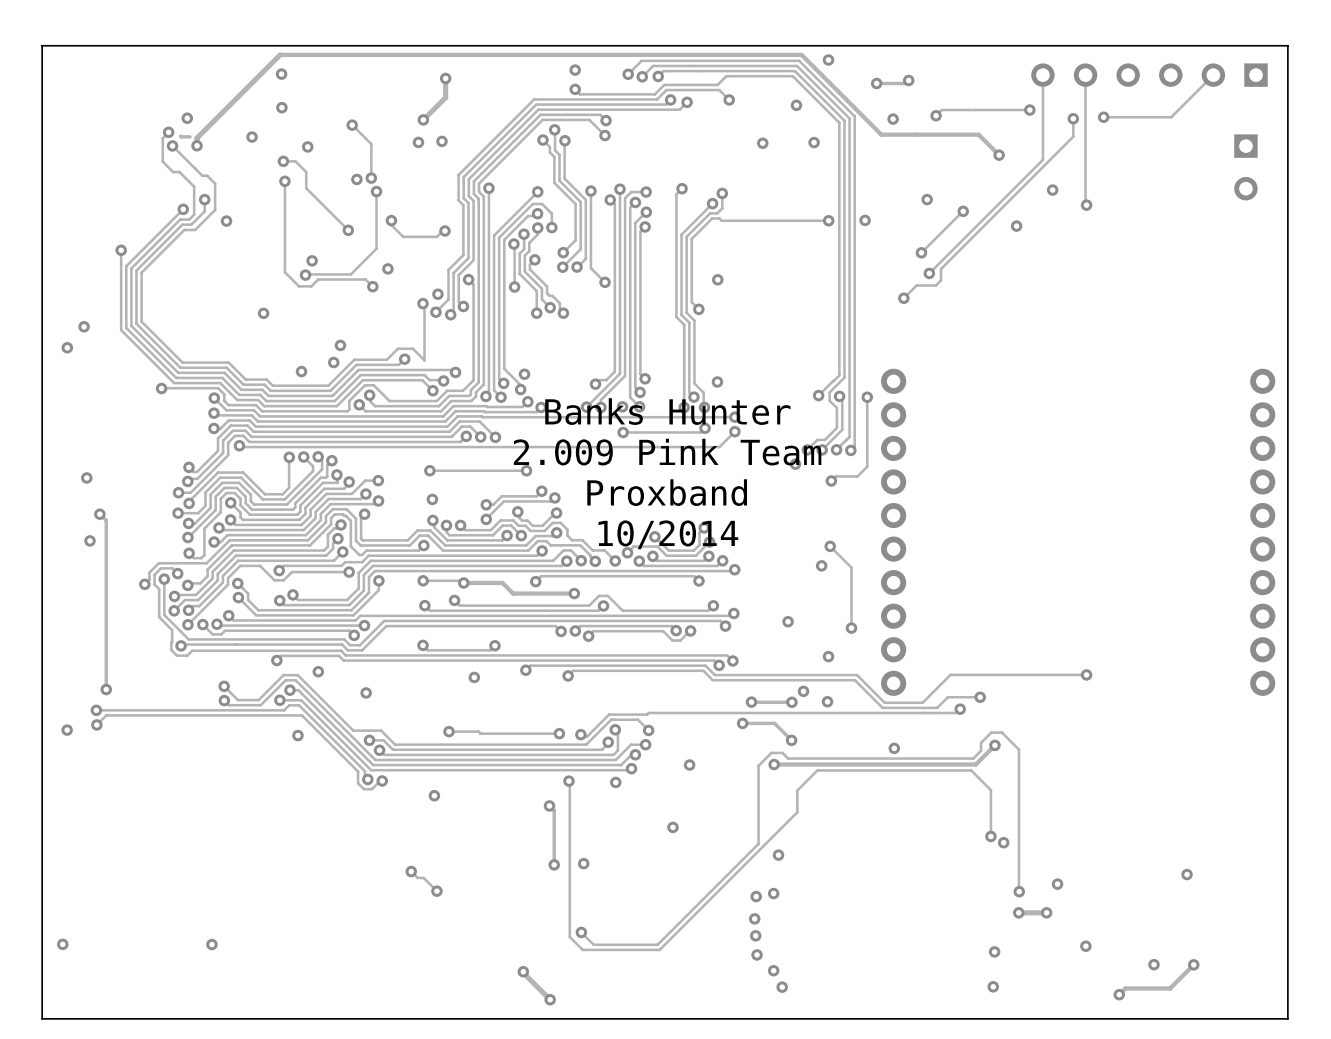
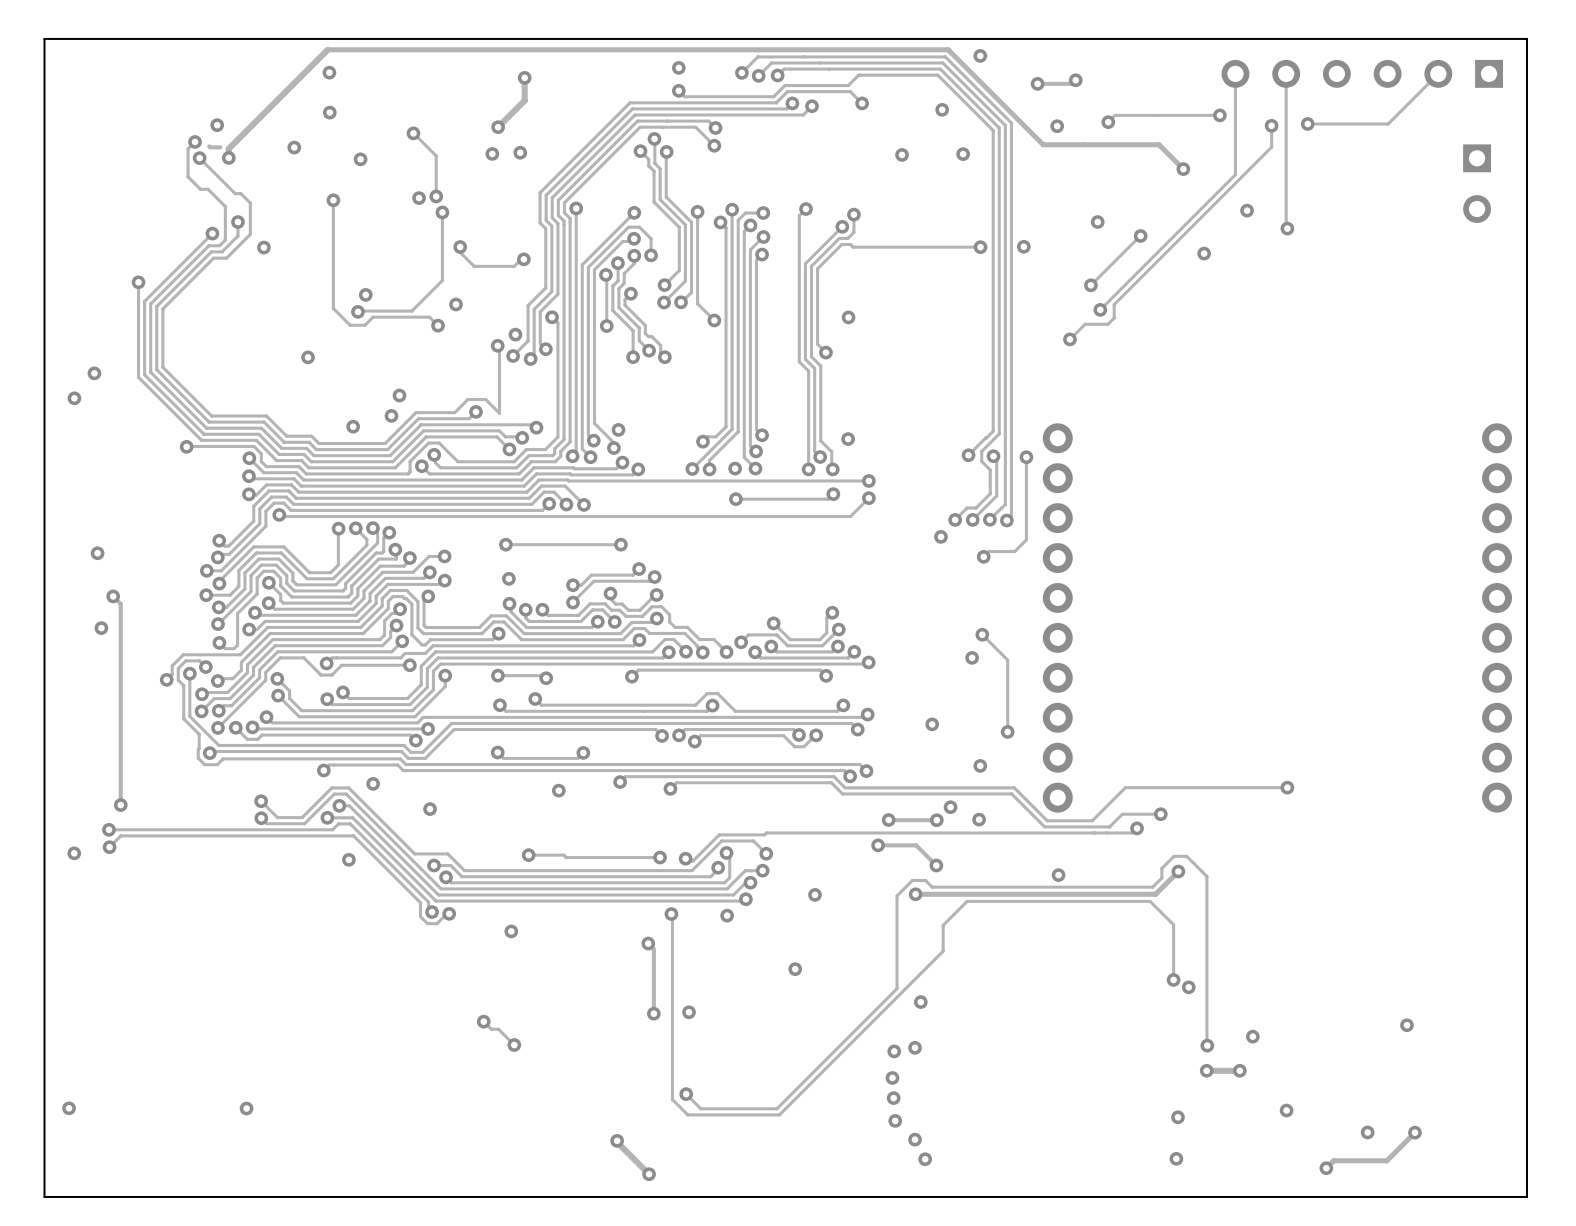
track: (283, 161) (295, 161) (306, 172) (306, 188) (348, 230) -> none
via: (283, 161) -> none
via: (348, 230) -> none
text: Banks Hunter (667, 411) -> none
text: 2.009 Pink Team (667, 452) -> none
text: Proxband (667, 492) -> none
text: 10/2014 (668, 534) -> none
track: (463, 582) (502, 582) (513, 593) (574, 593) -> none
via: (574, 593) -> none

